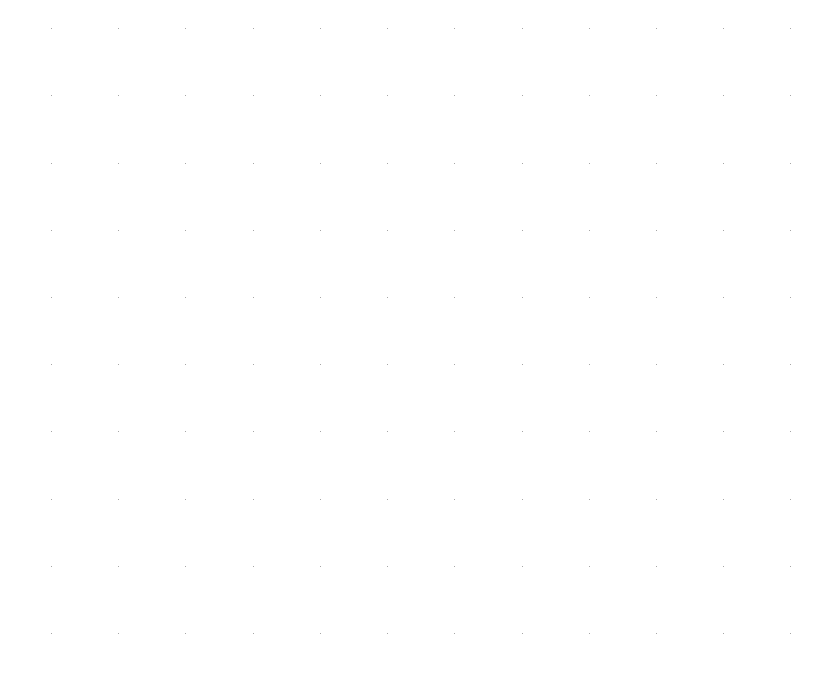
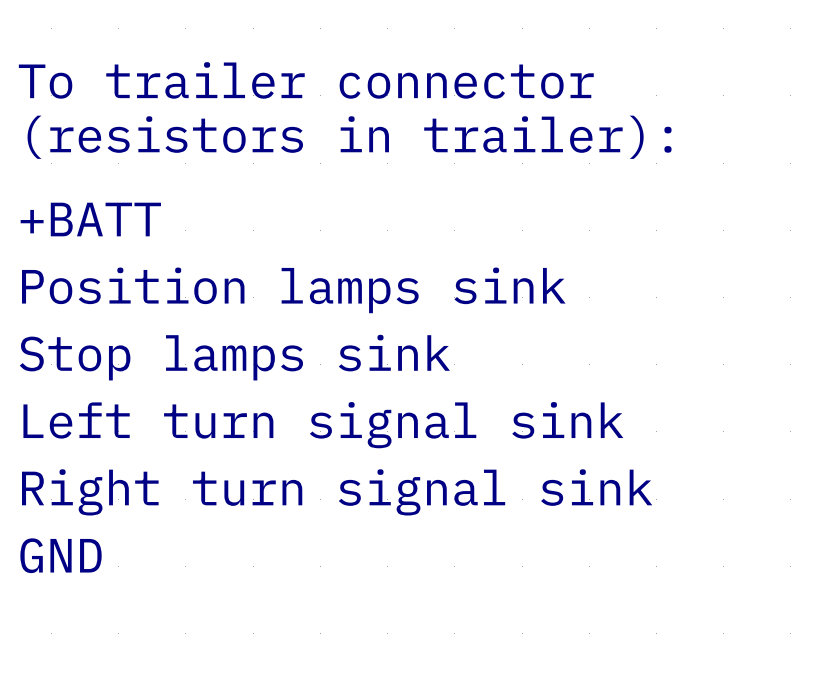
text: none -> To trailer connector (306, 80)
text: none -> (resistors in trailer): (349, 137)
text: none -> +BATT (90, 219)
text: none -> Position lamps sink (293, 290)
text: none -> Stop lamps sink (234, 357)
text: none -> Left turn signal sink (323, 425)
text: none -> Right turn signal sink (337, 492)
text: none -> GND (61, 555)

